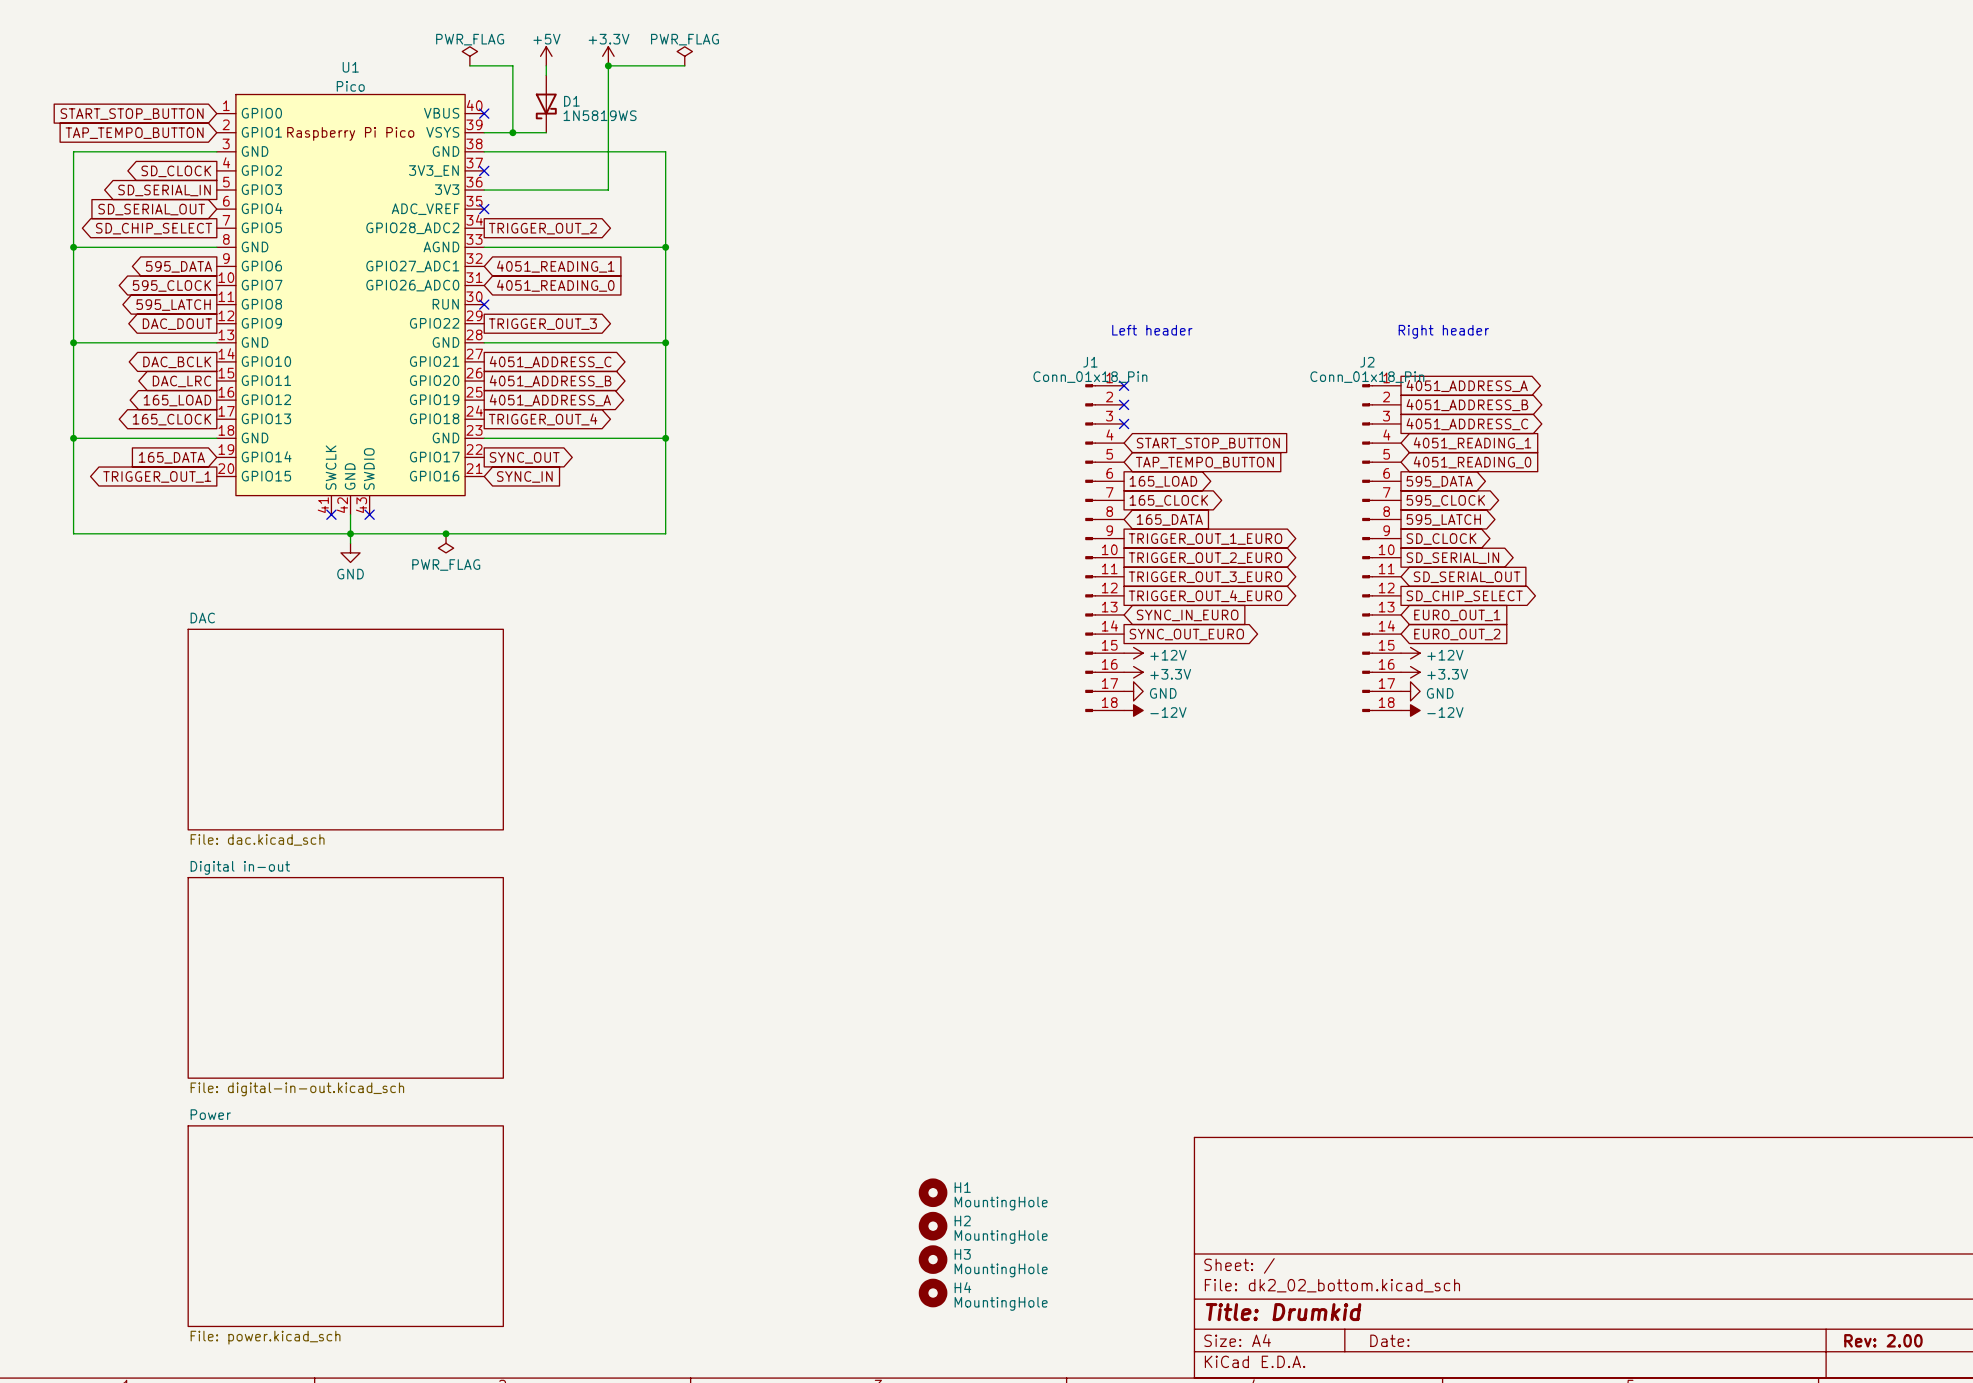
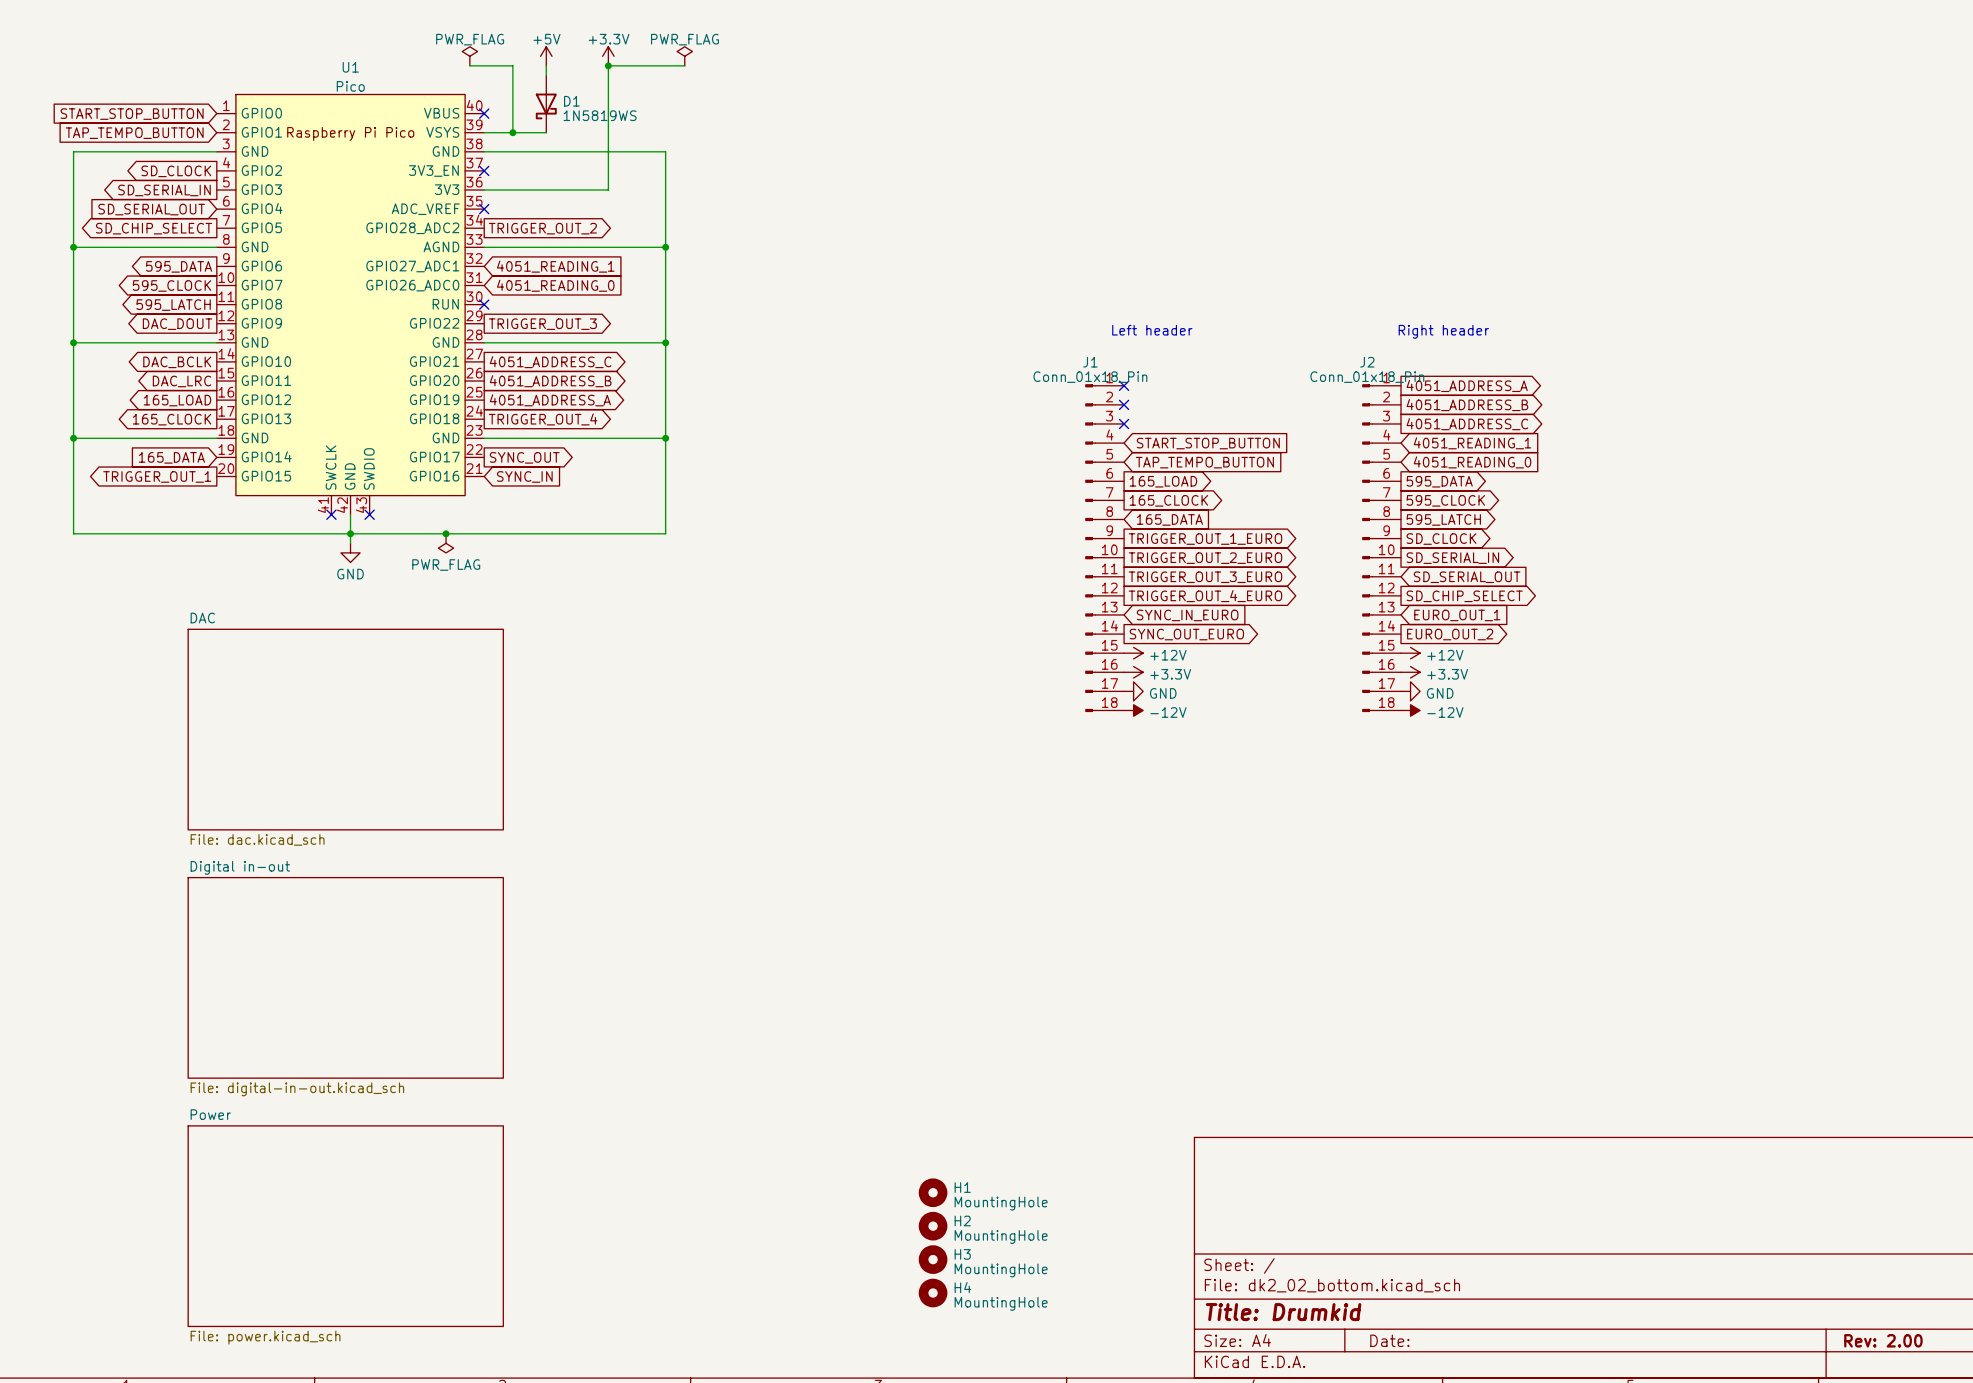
global label shape: input (1457, 634) -> output (1450, 634)

